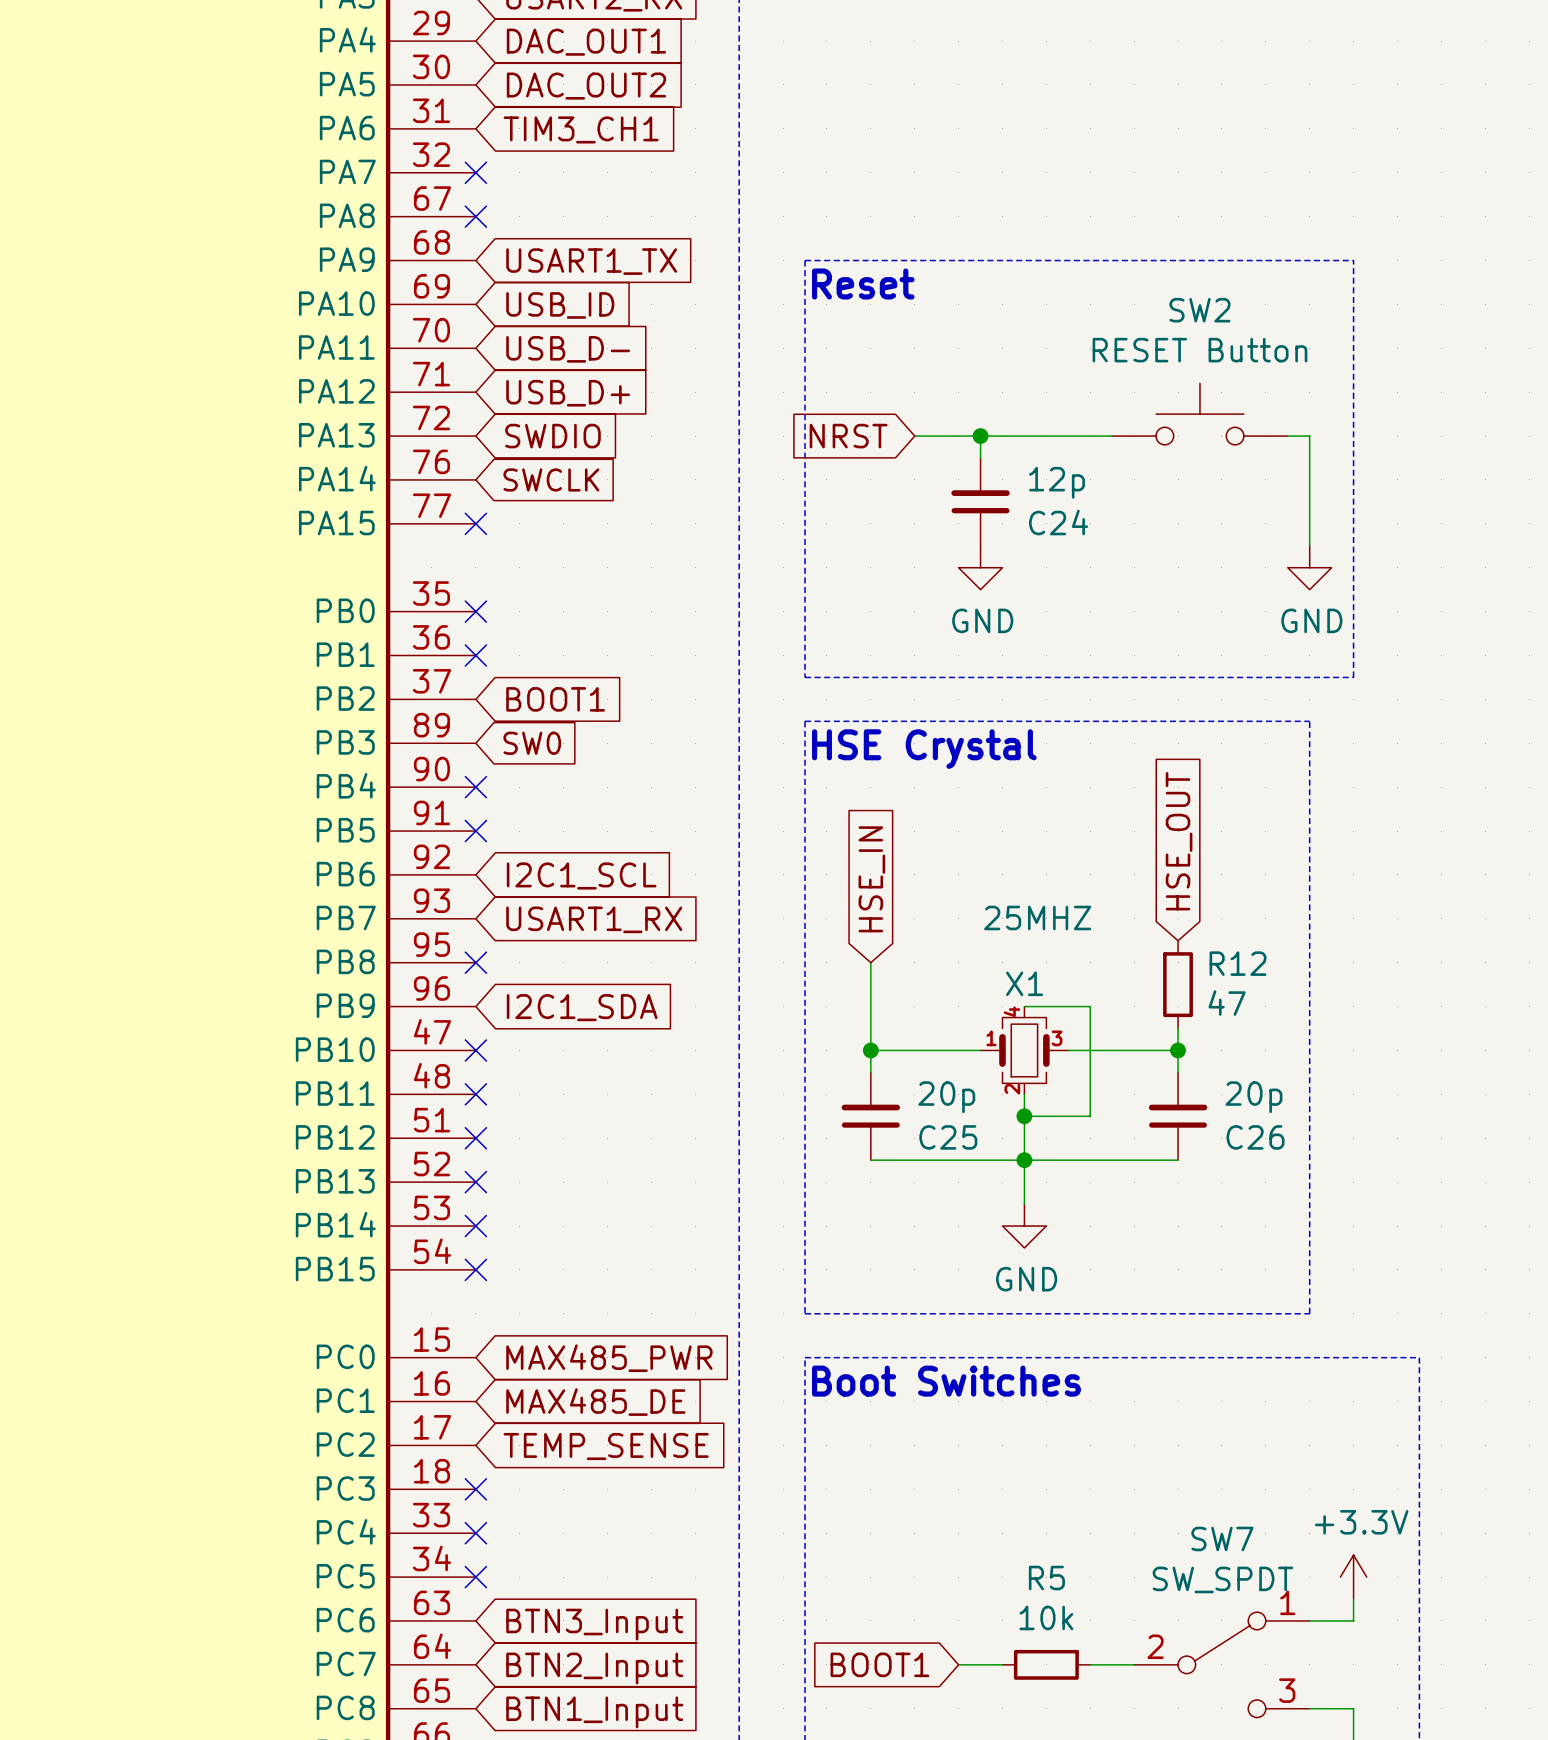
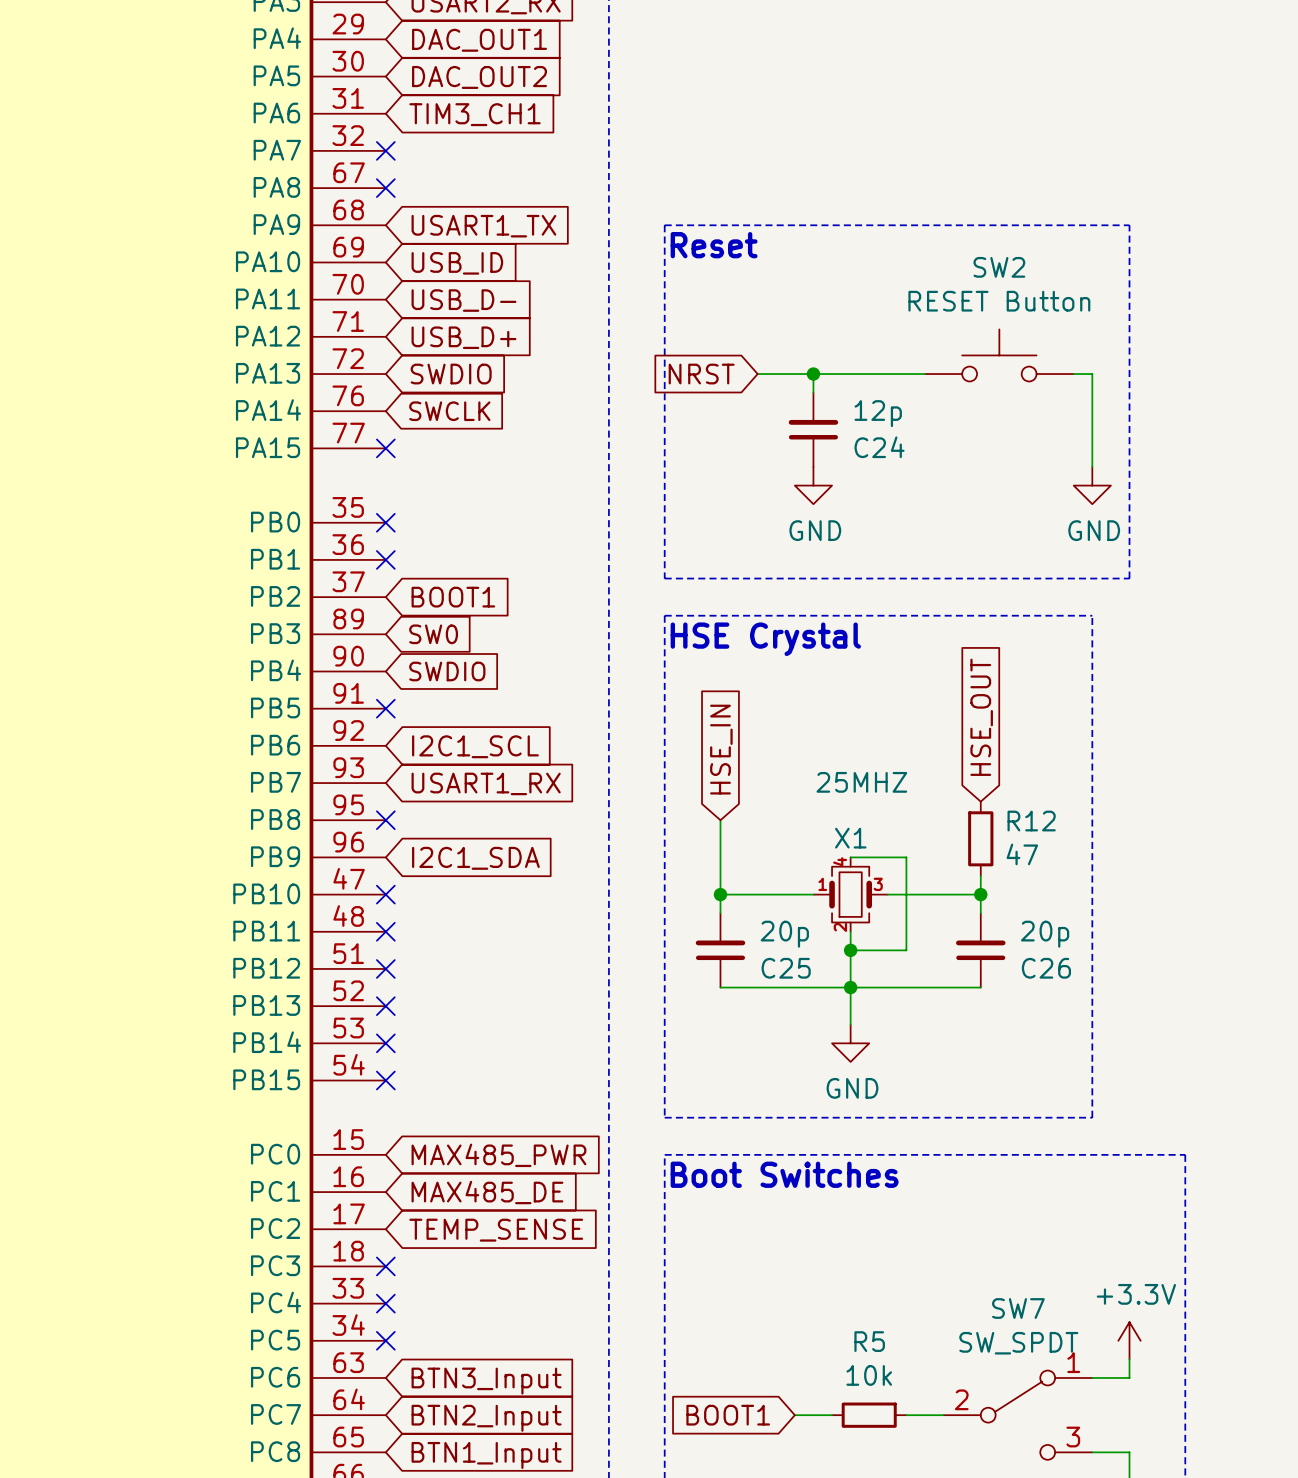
no-connect mark: (475, 787) -> none
global label: none -> SWDIO (447, 671)

